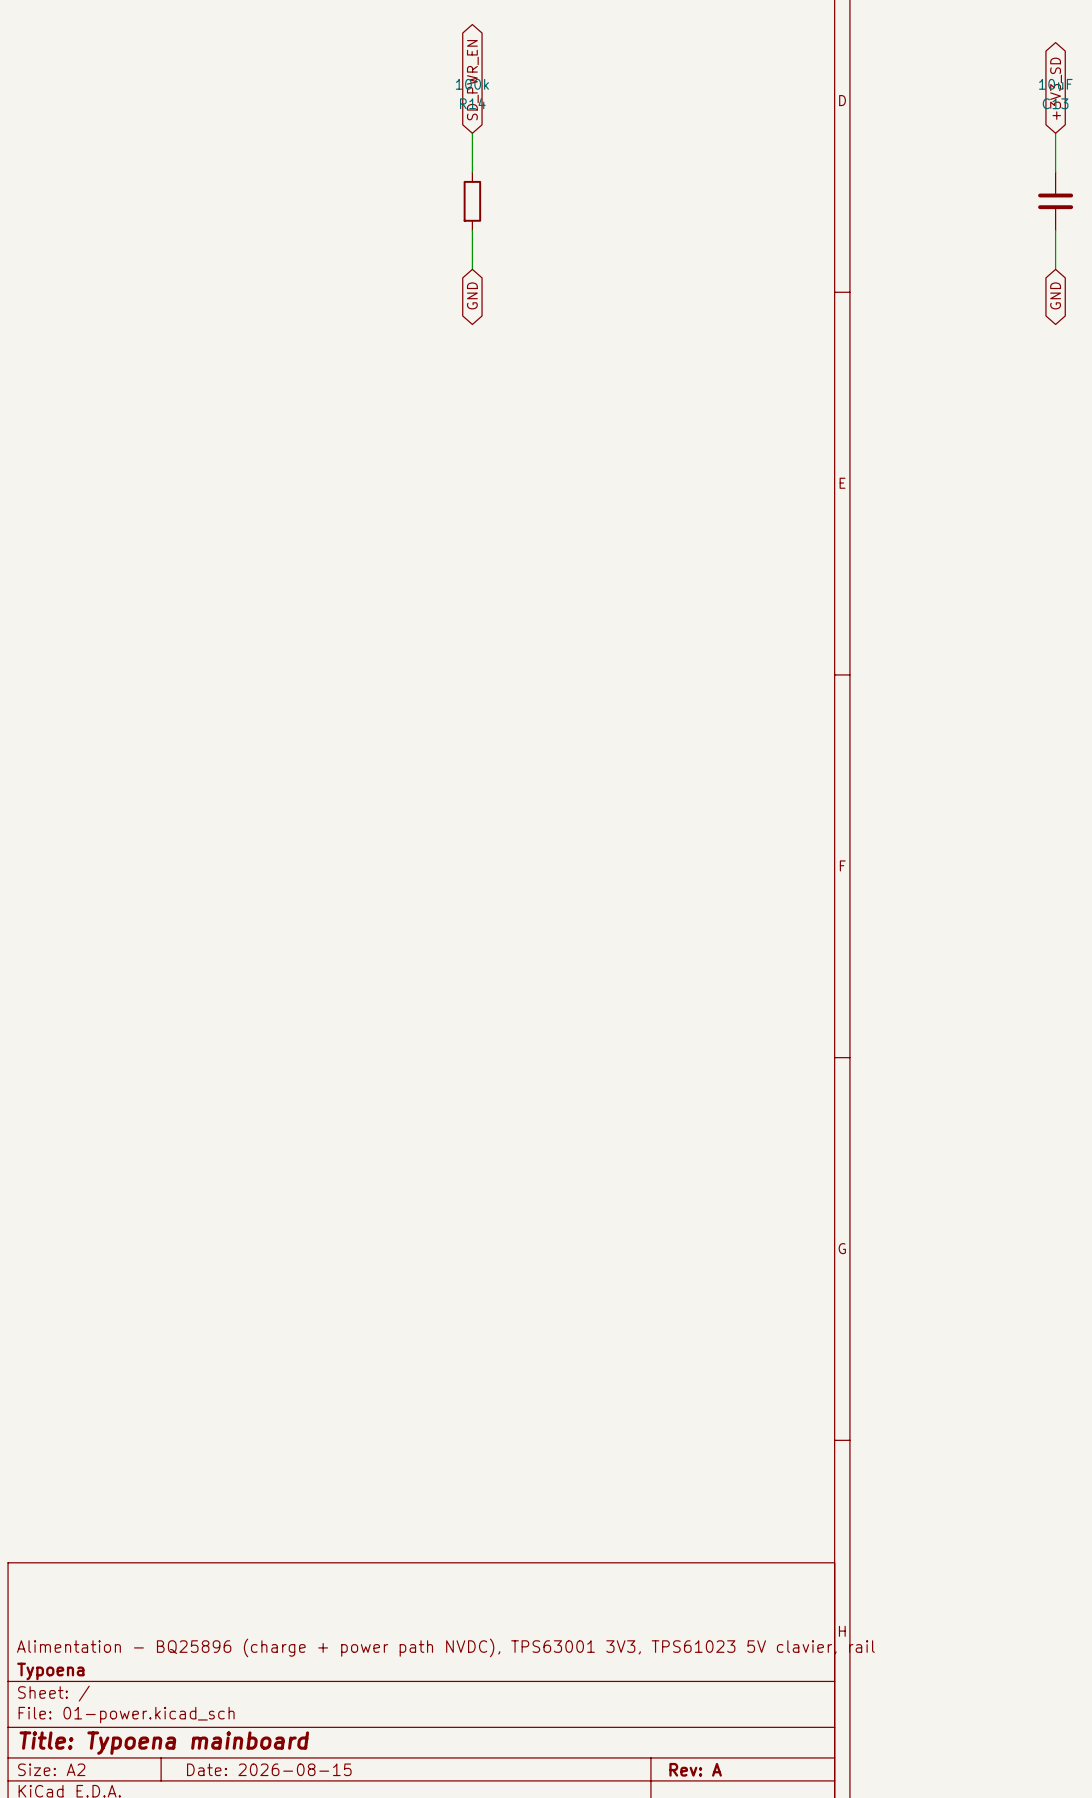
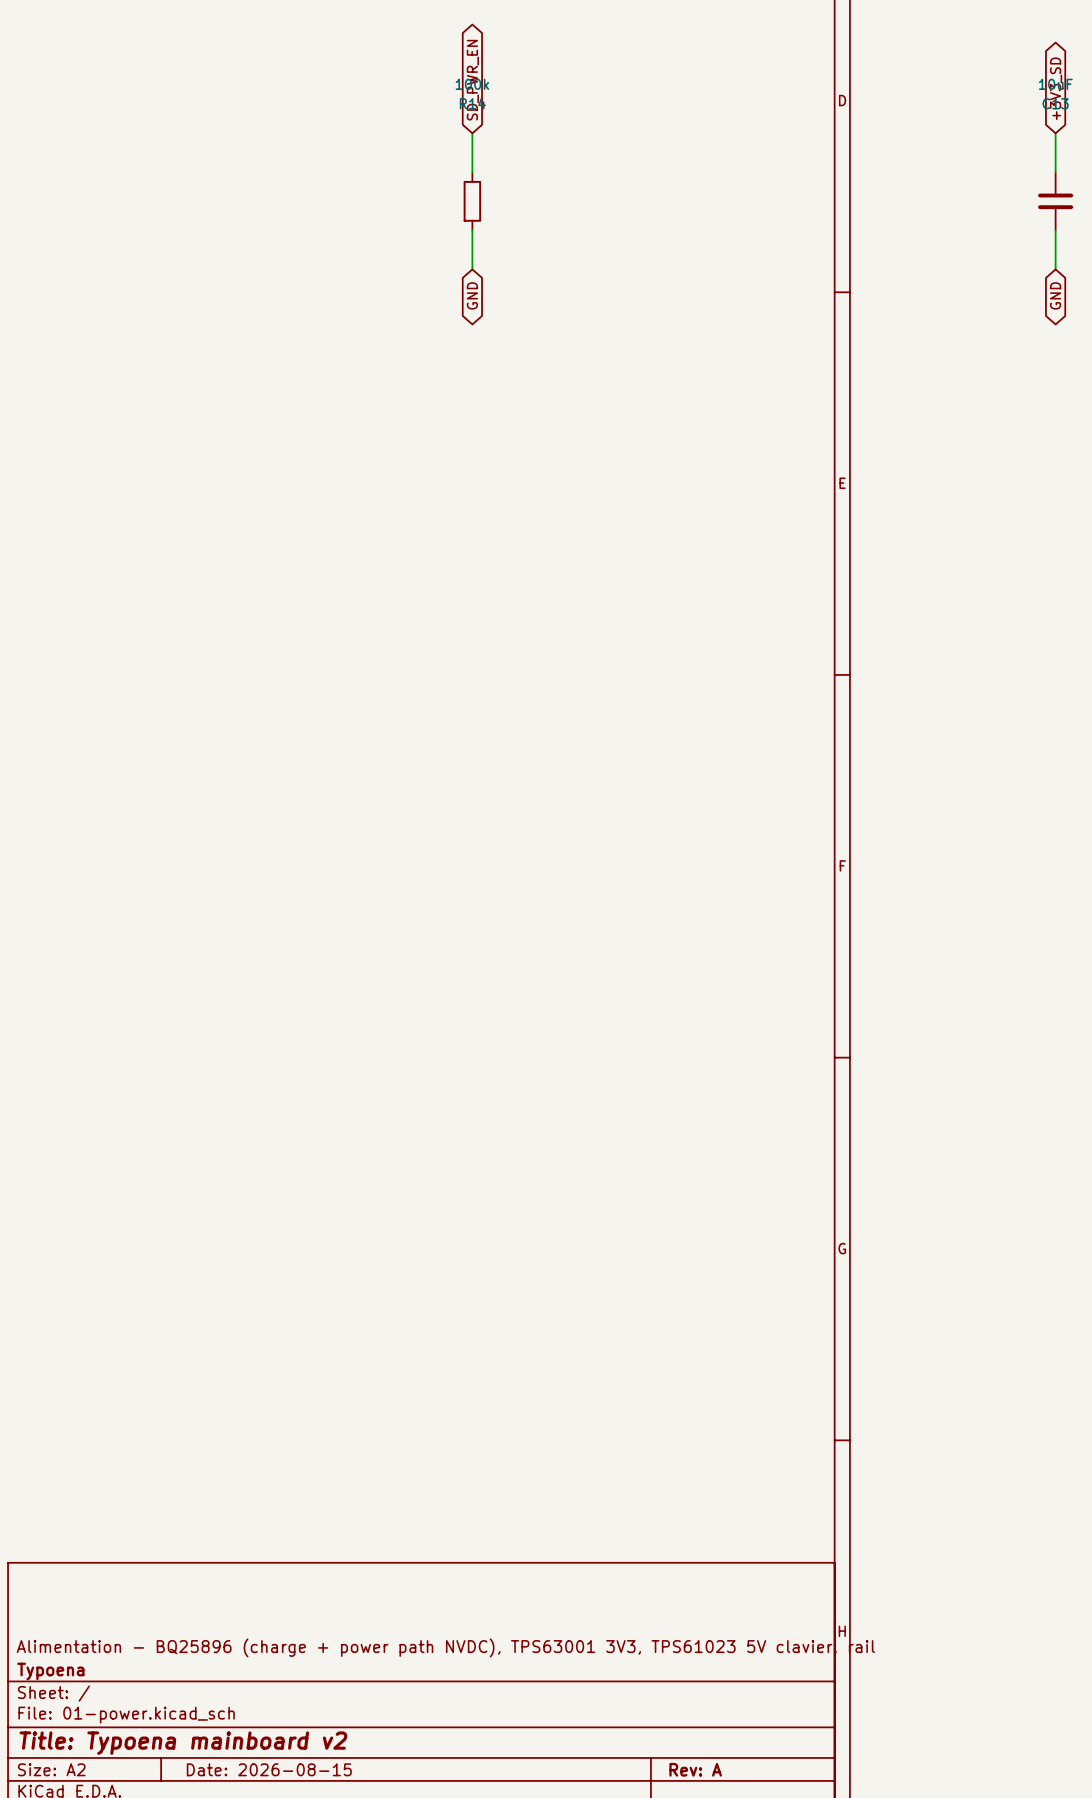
title block: Title: Typoena mainboard (164, 1743) -> Title: Typoena mainboard v2 (183, 1743)

